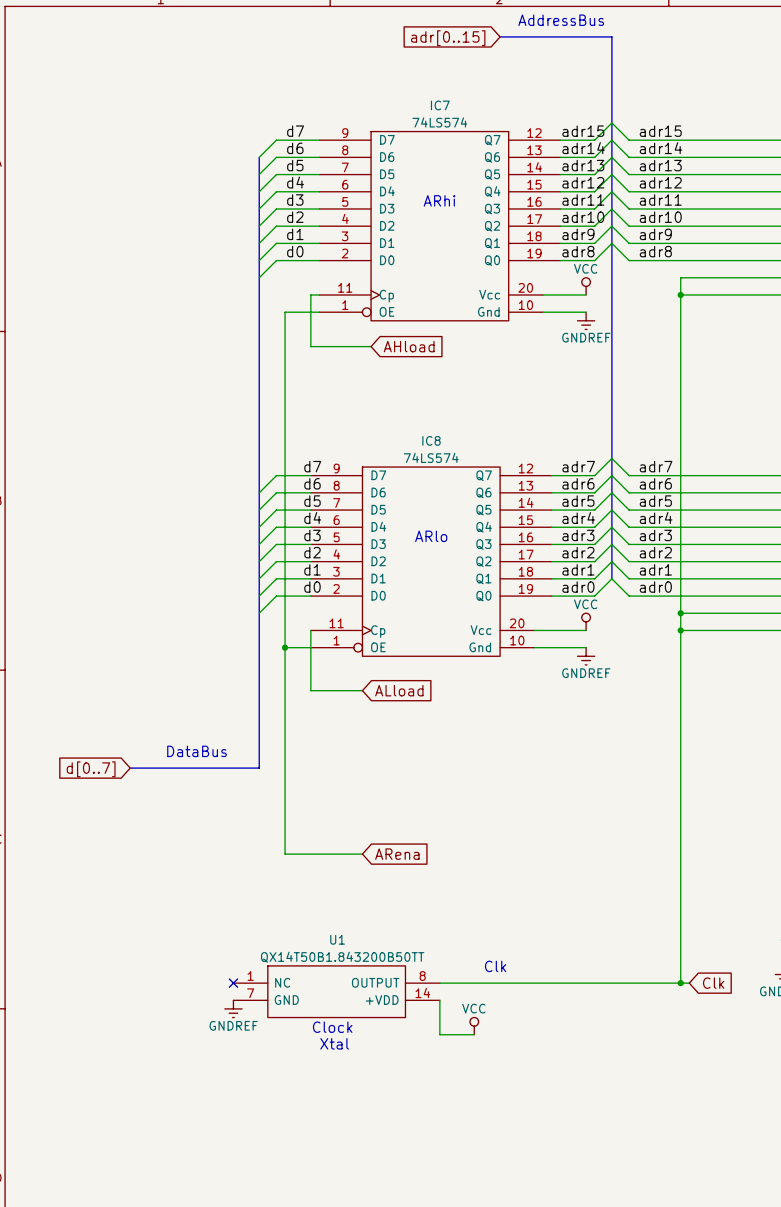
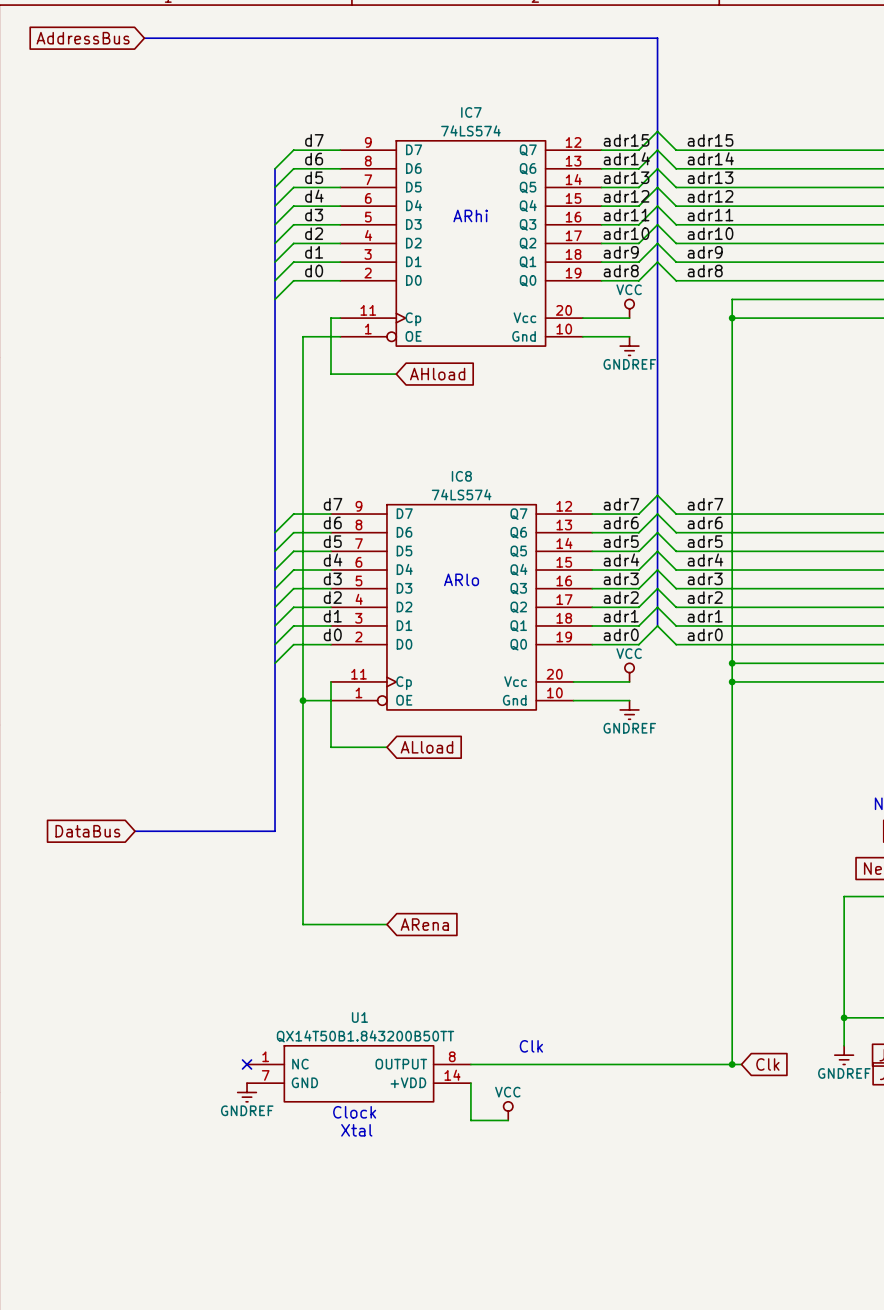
text: AddressBus (561, 20) -> none
global label: none -> AddressBus (83, 38)
bus: none -> (144, 38) (536, 38)
global label: adr[0..15] (448, 38) -> none
text: DataBus (197, 751) -> none
global label: d[0..7] (91, 769) -> DataBus (87, 831)

